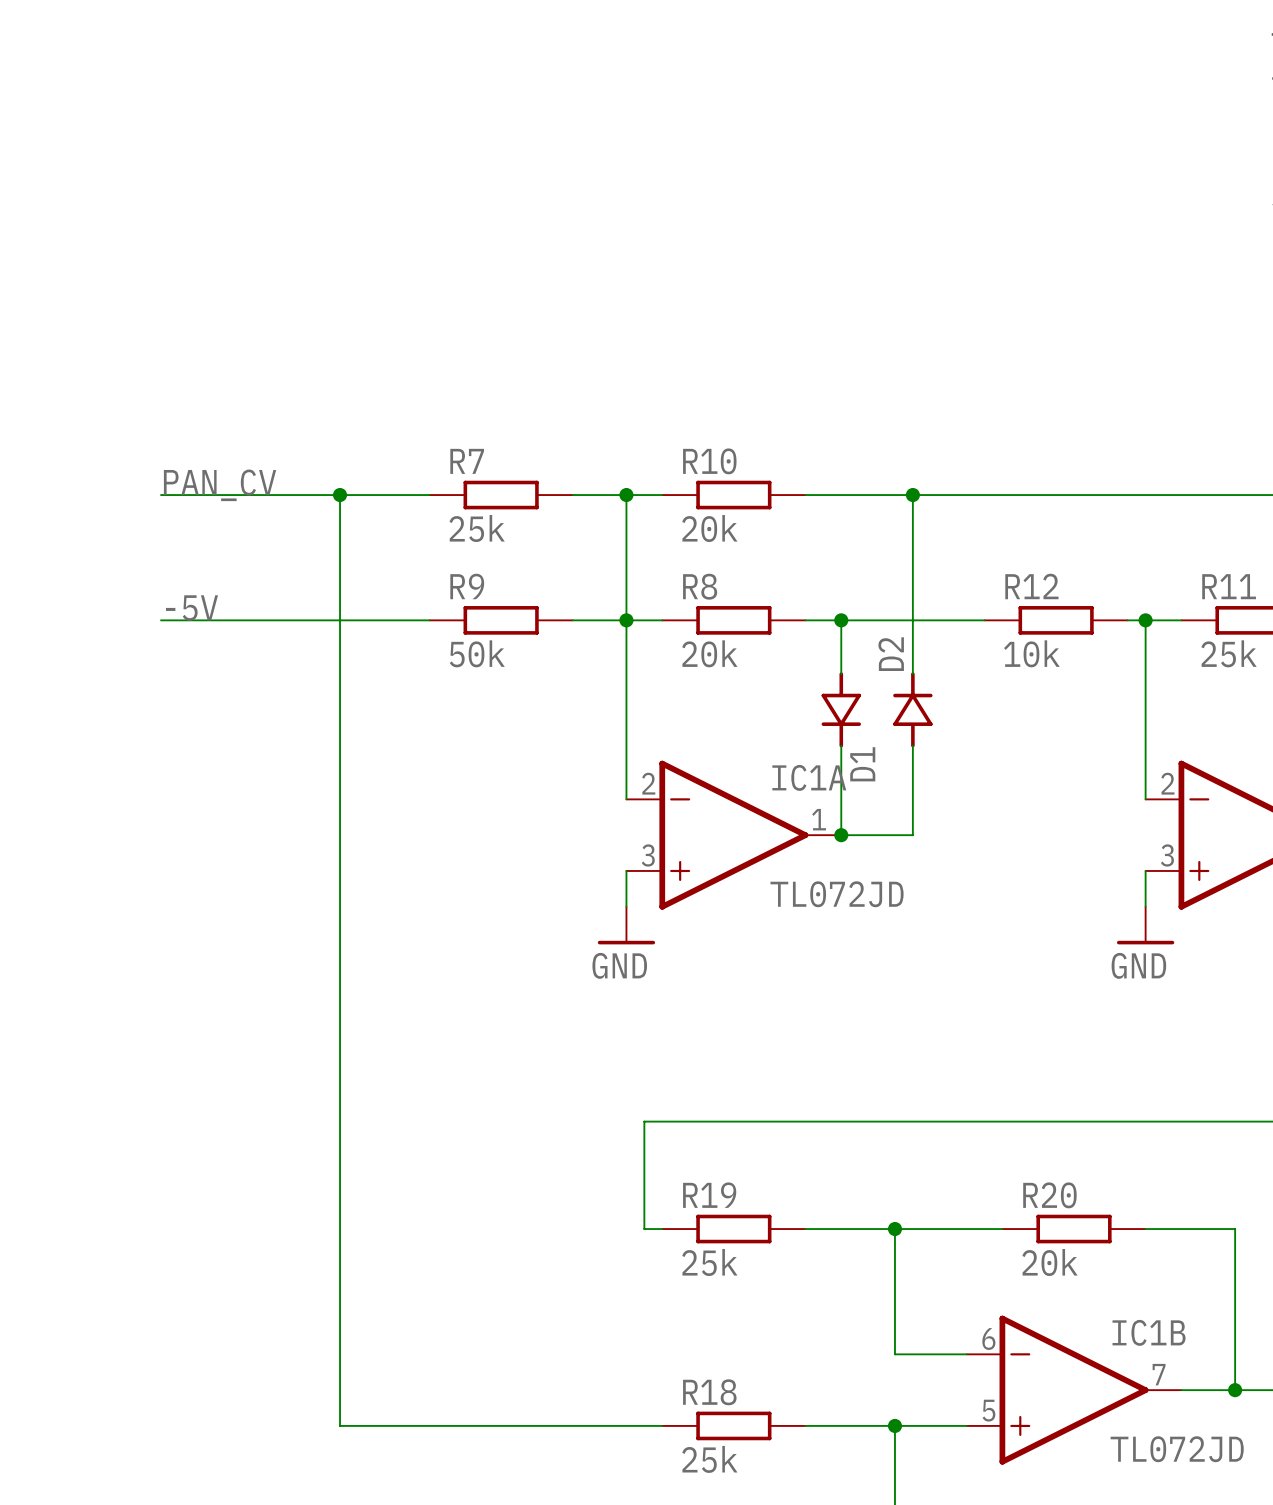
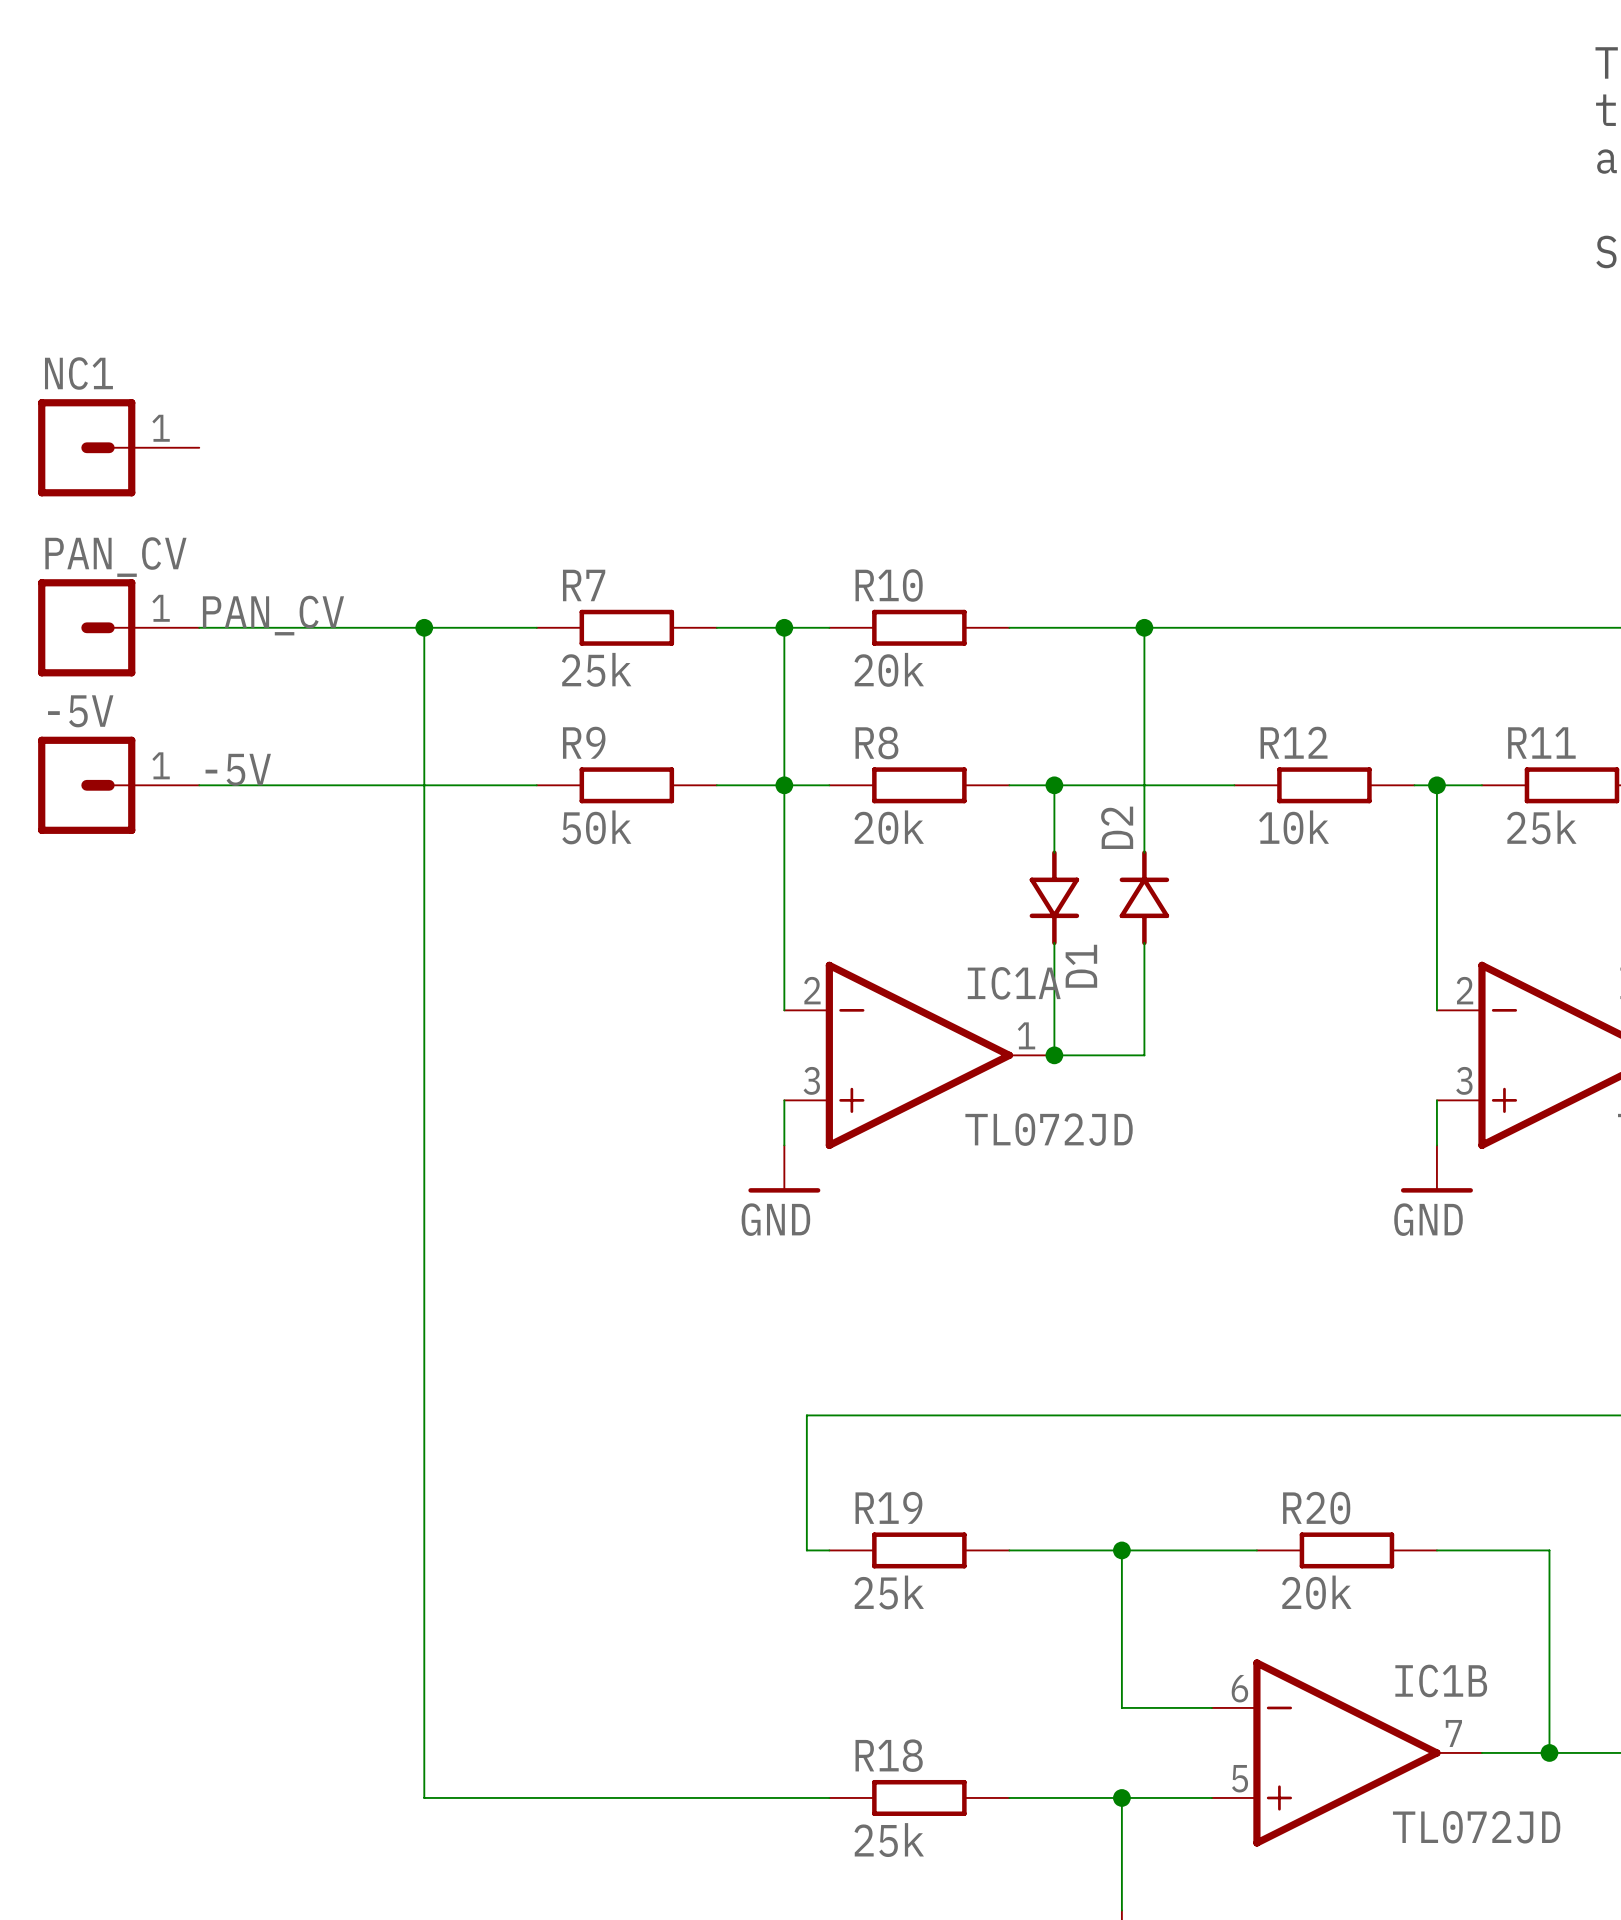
NC1: none -> (118, 447)
PAN_CV: none -> (118, 627)
-5V: none -> (118, 785)

